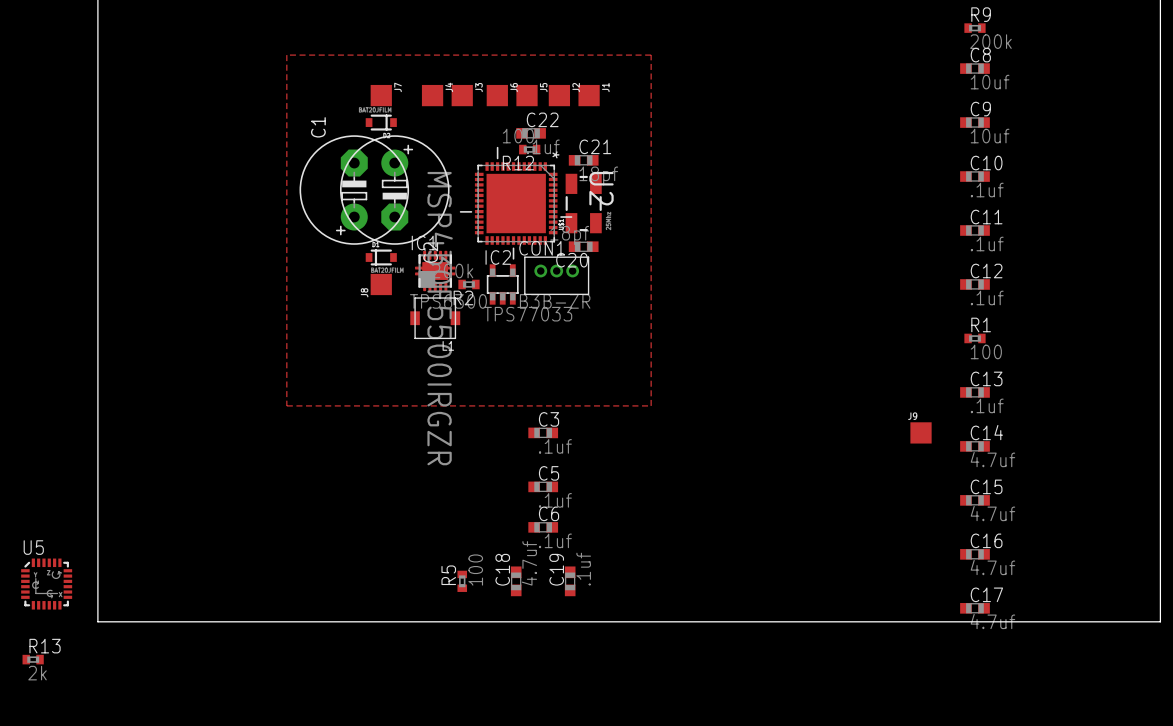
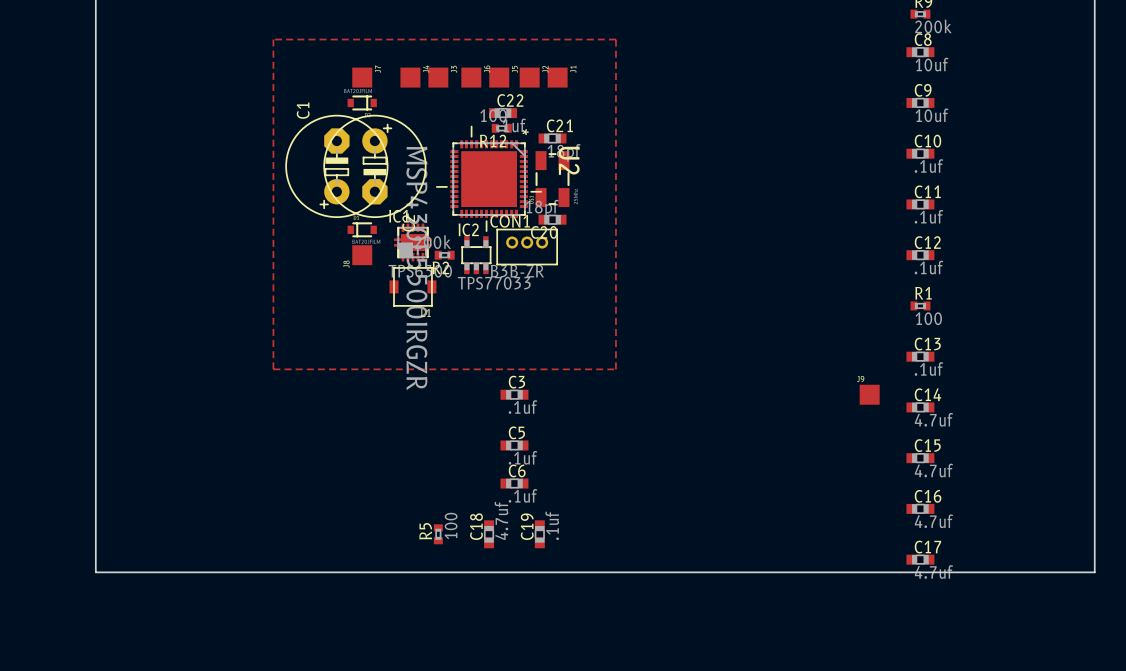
U5: (46, 584) -> none
R13: 2k (33, 659) -> none

